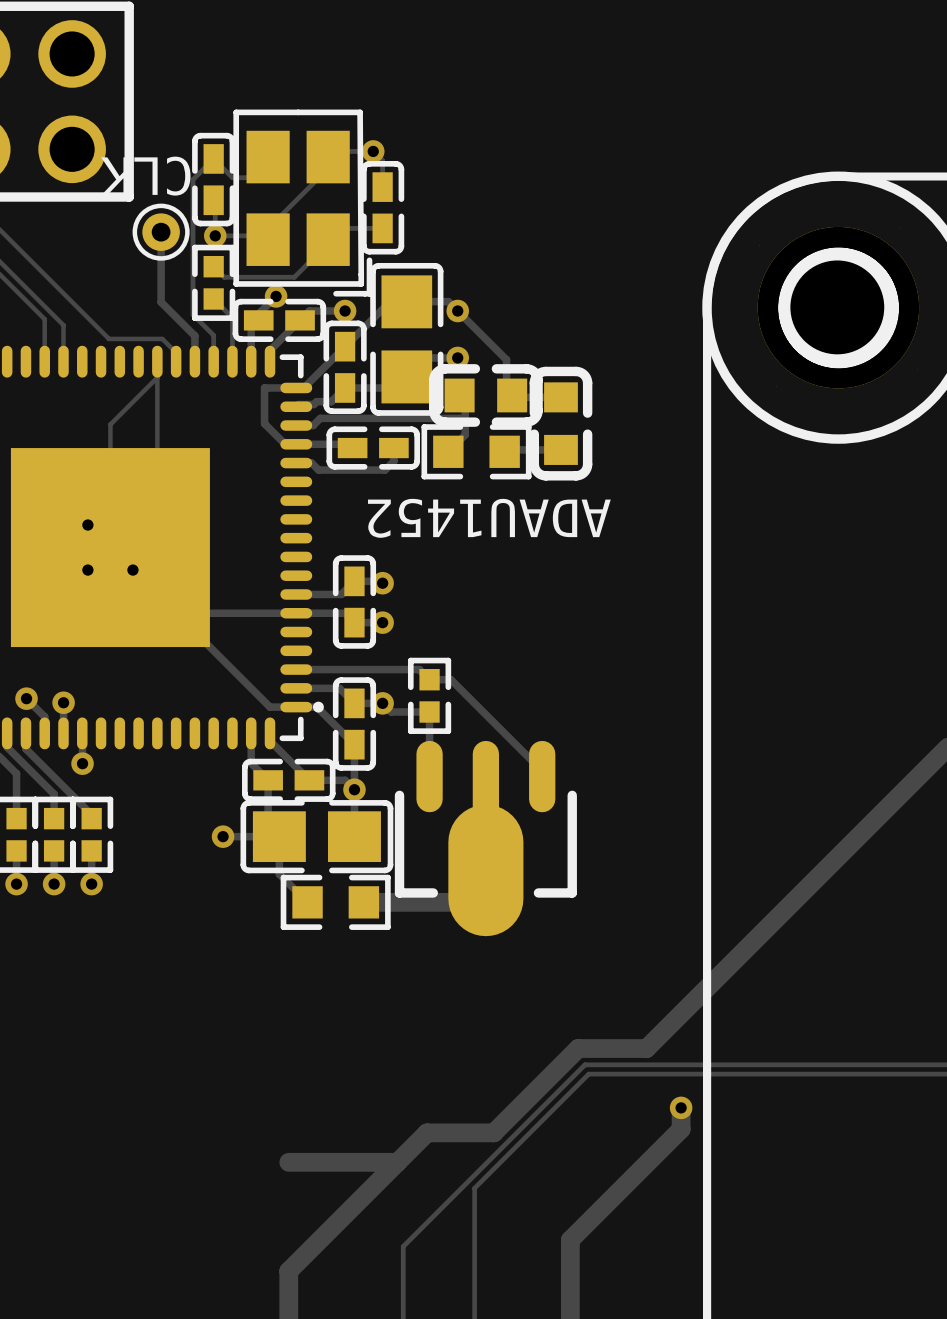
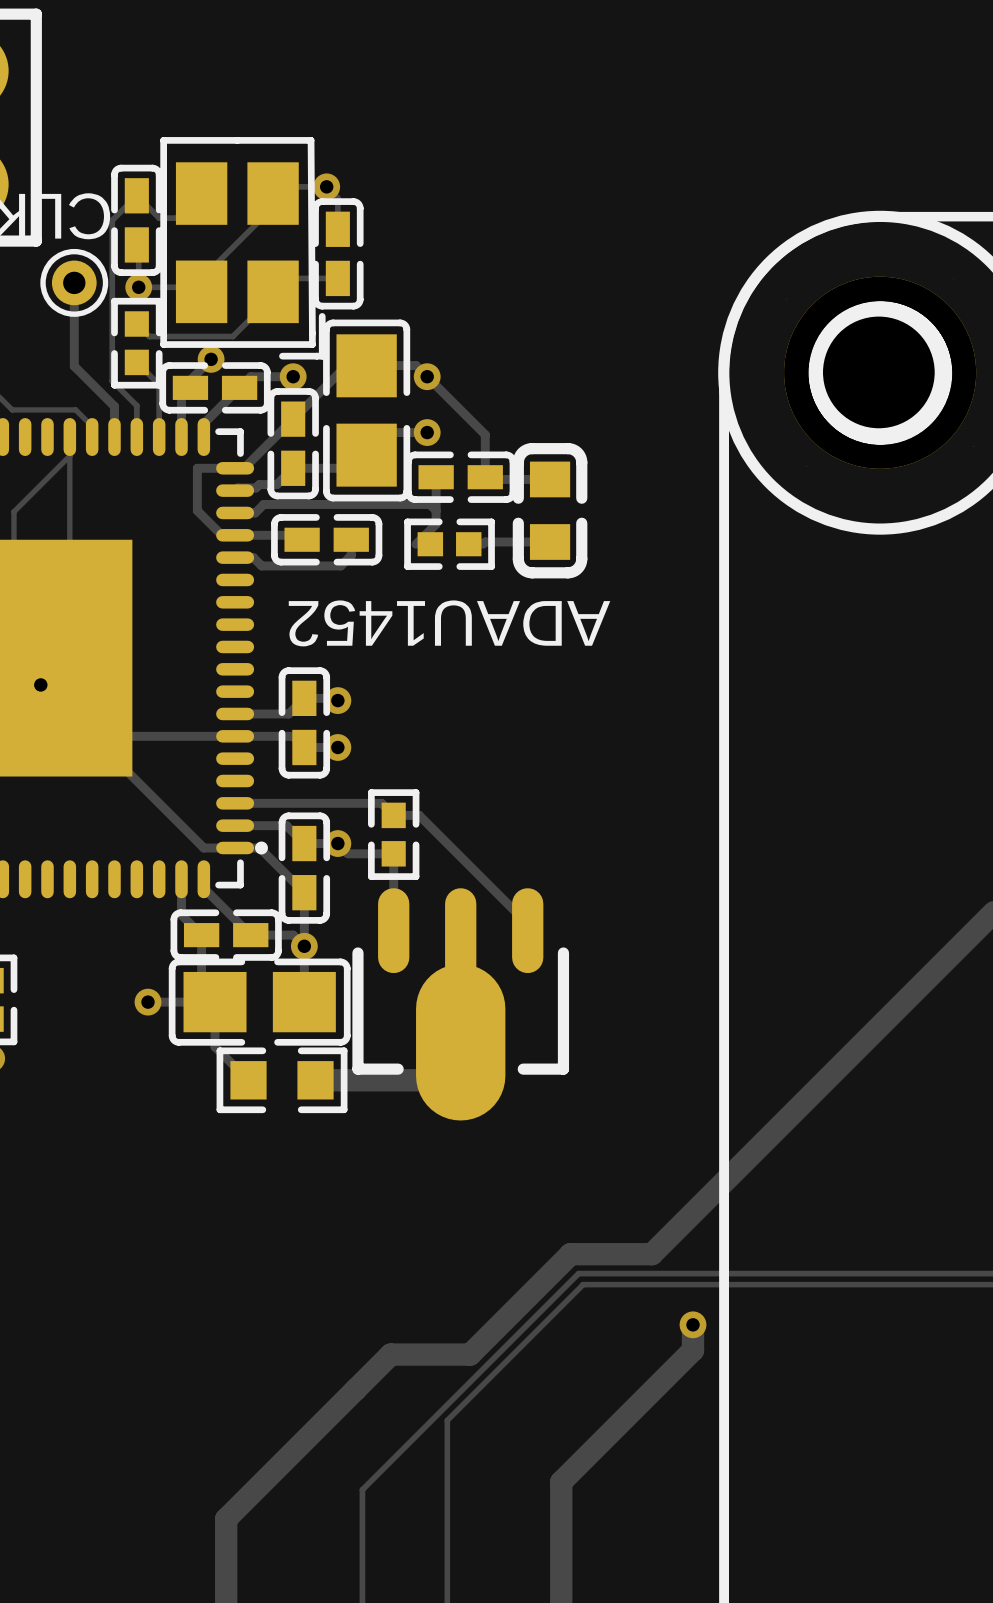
part footprint: [429, 364, 543, 427] -> [405, 451, 517, 503]
part footprint: [421, 424, 532, 480] -> [404, 518, 495, 570]
track: (288, 1162) (397, 1162) -> none

